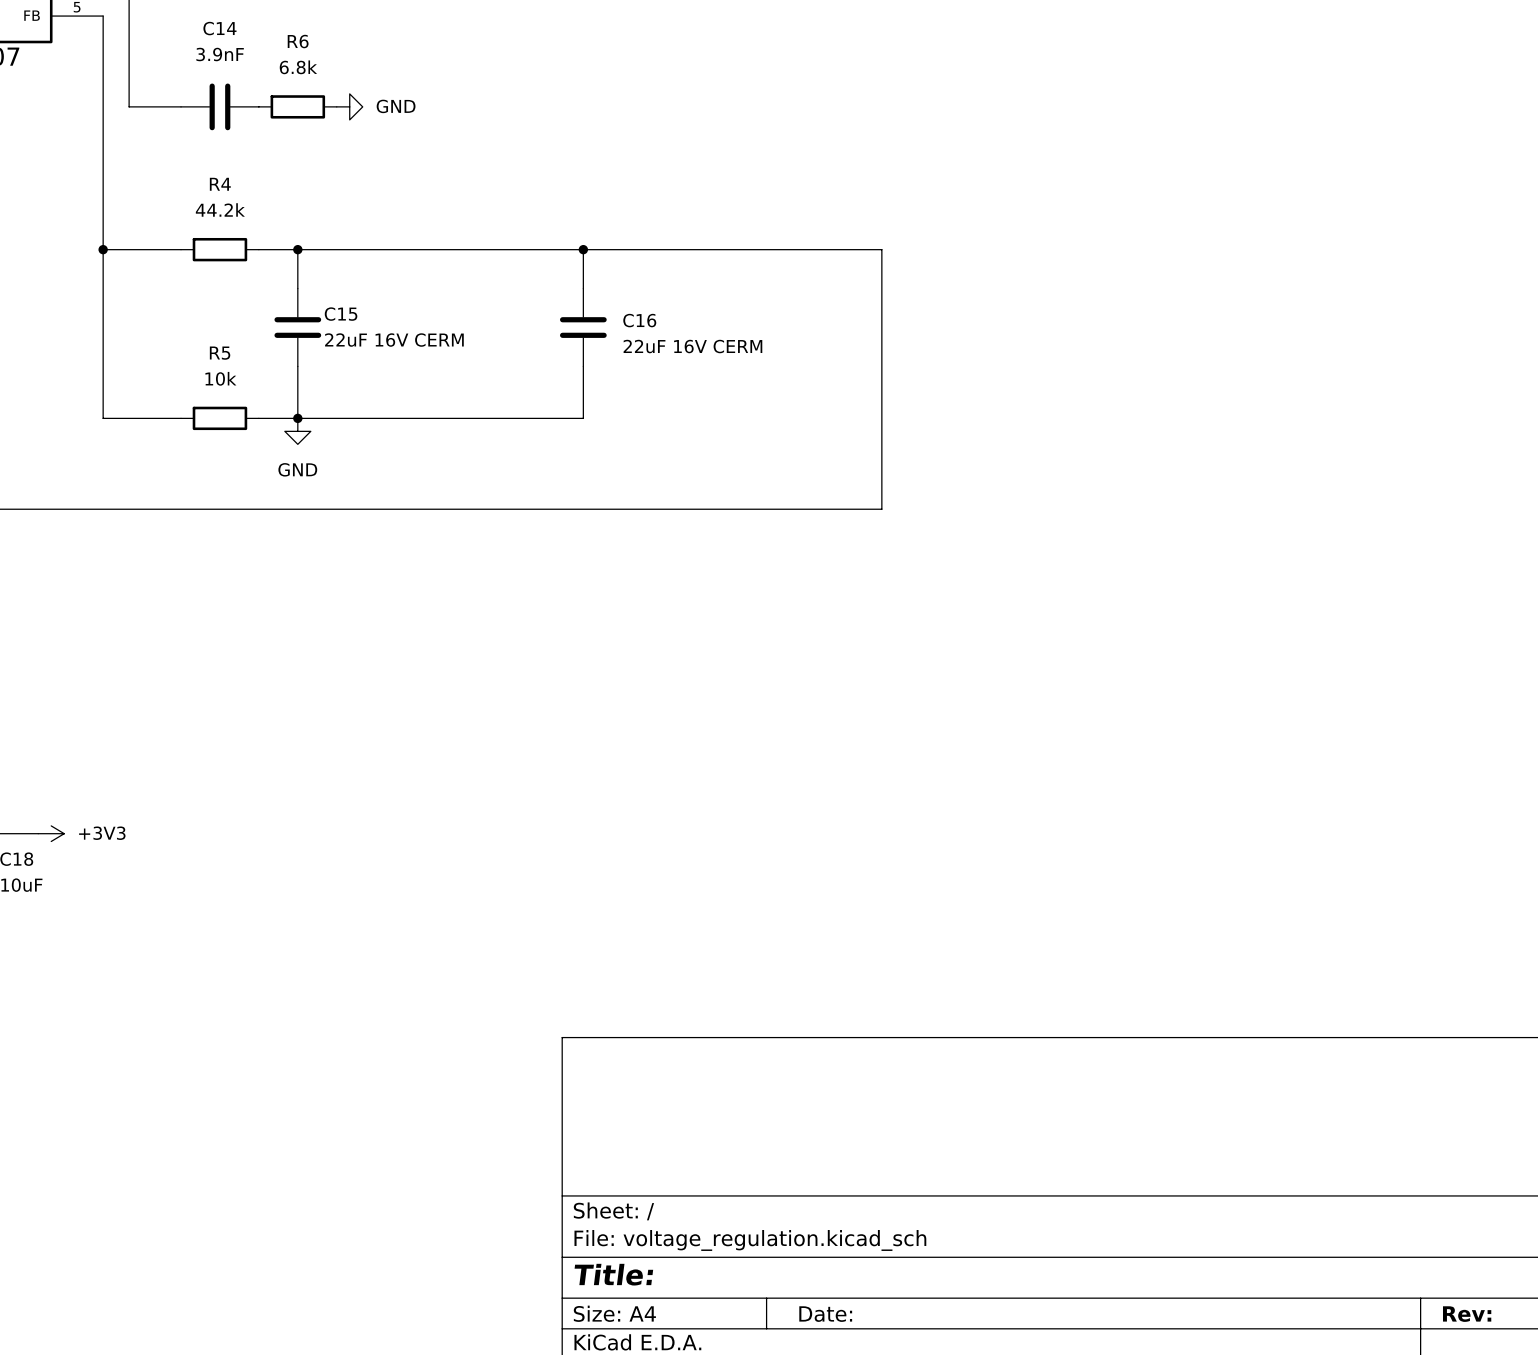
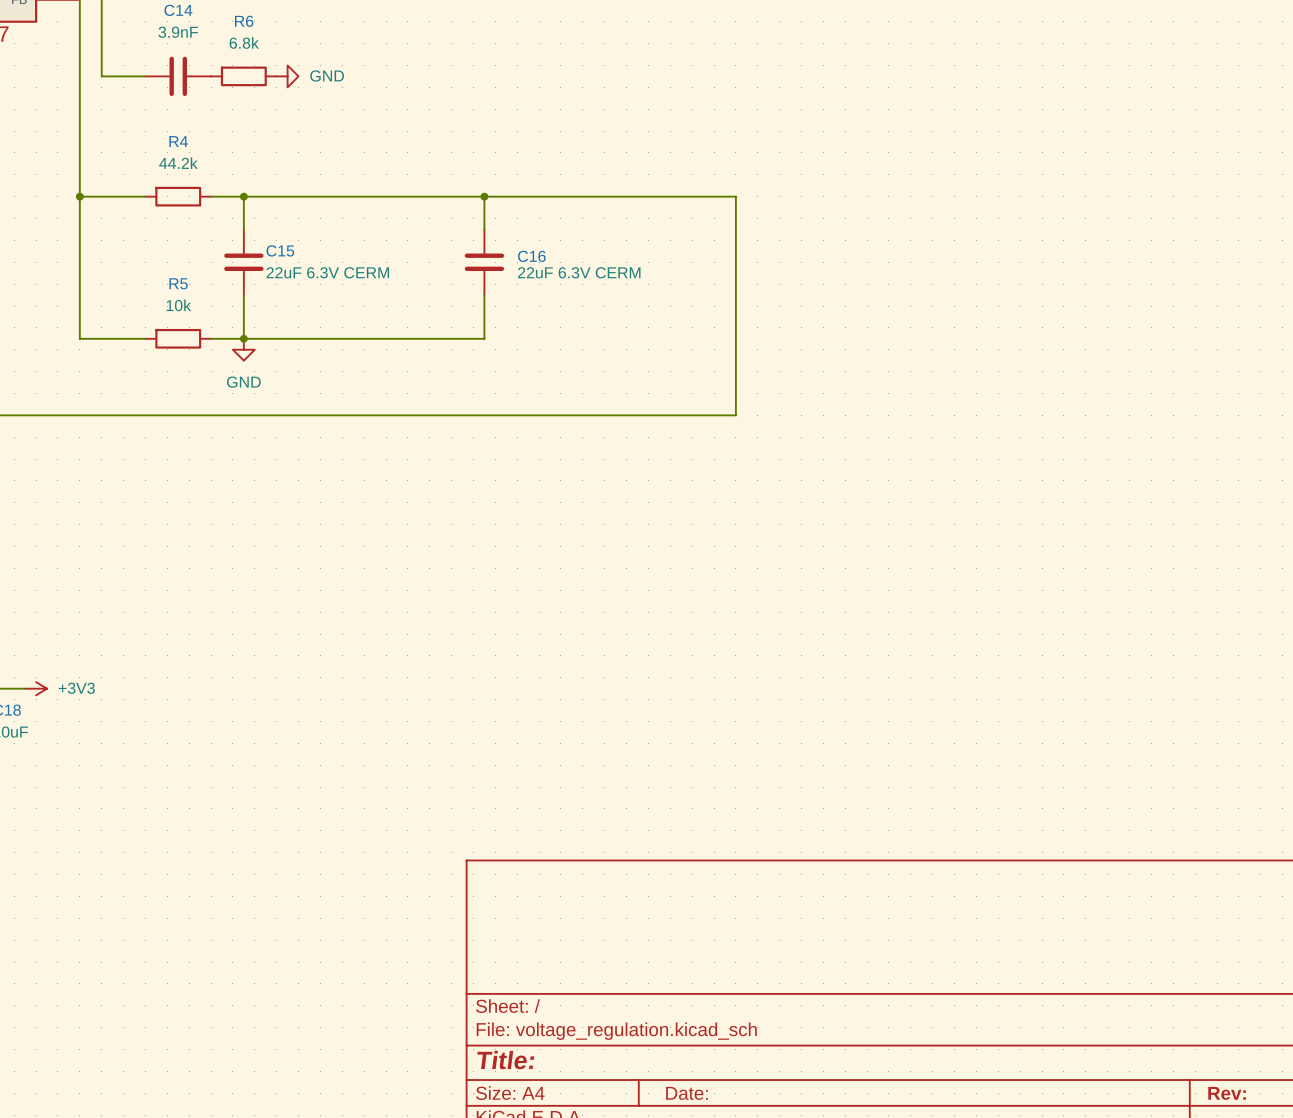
C15 value: 22uF 16V CERM (394, 340) -> 22uF 6.3V CERM (327, 272)
C16 value: 22uF 16V CERM (692, 346) -> 22uF 6.3V CERM (579, 272)

